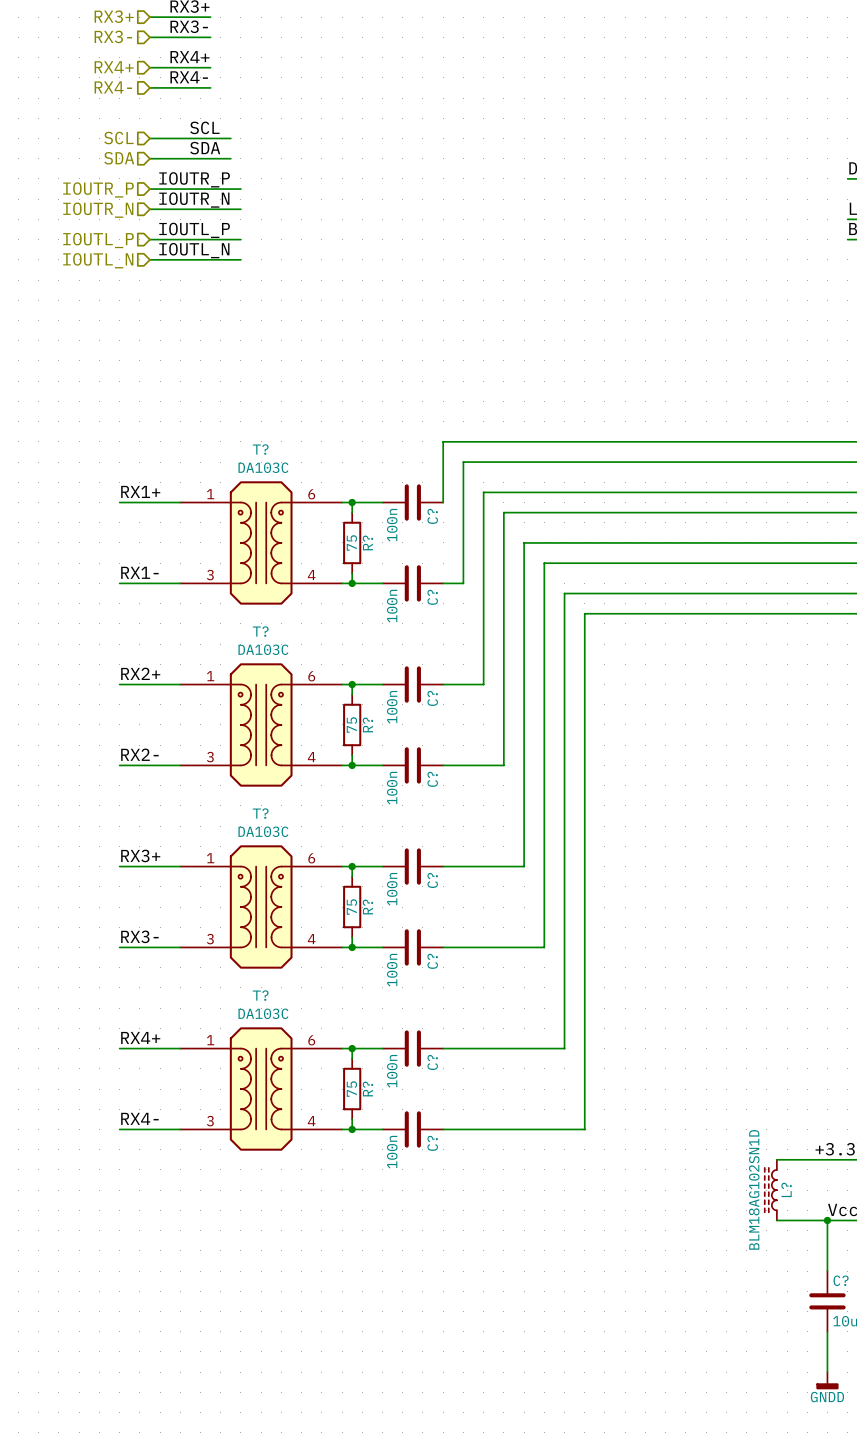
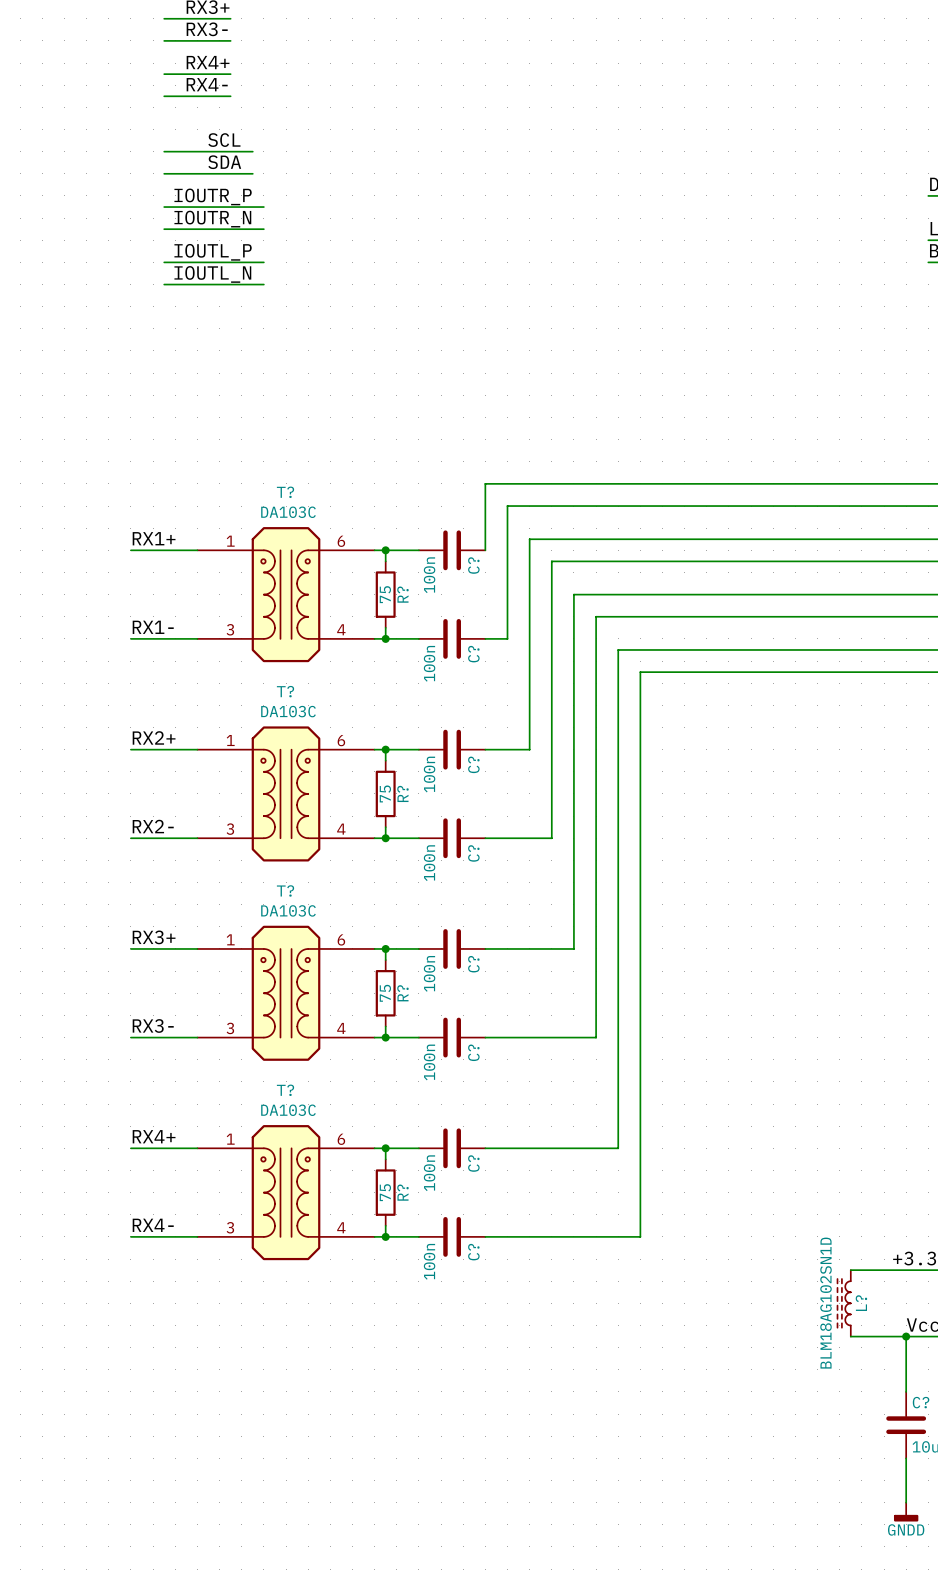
hierarchical label: RX3+ (114, 16) -> none
hierarchical label: RX3- (113, 36) -> none
hierarchical label: RX4+ (114, 67) -> none
hierarchical label: RX4- (113, 87) -> none
hierarchical label: SCL (118, 138) -> none
hierarchical label: SDA (119, 158) -> none
hierarchical label: IOUTR_P (98, 189) -> none
hierarchical label: IOUTR_N (98, 210) -> none
hierarchical label: IOUTL_P (98, 240) -> none
hierarchical label: IOUTL_N (98, 260) -> none

